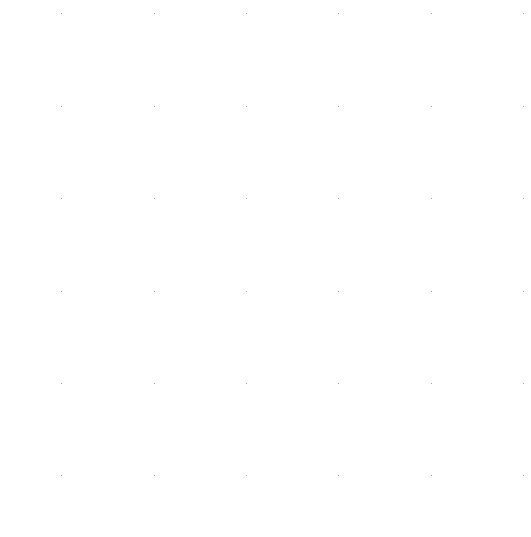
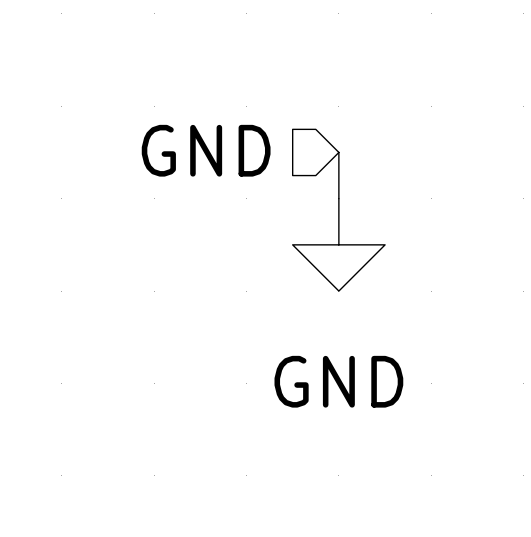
hierarchical label: none -> GND (206, 150)
wire: none -> (338, 152) (338, 198)
power symbol: none -> GND (338, 244)

